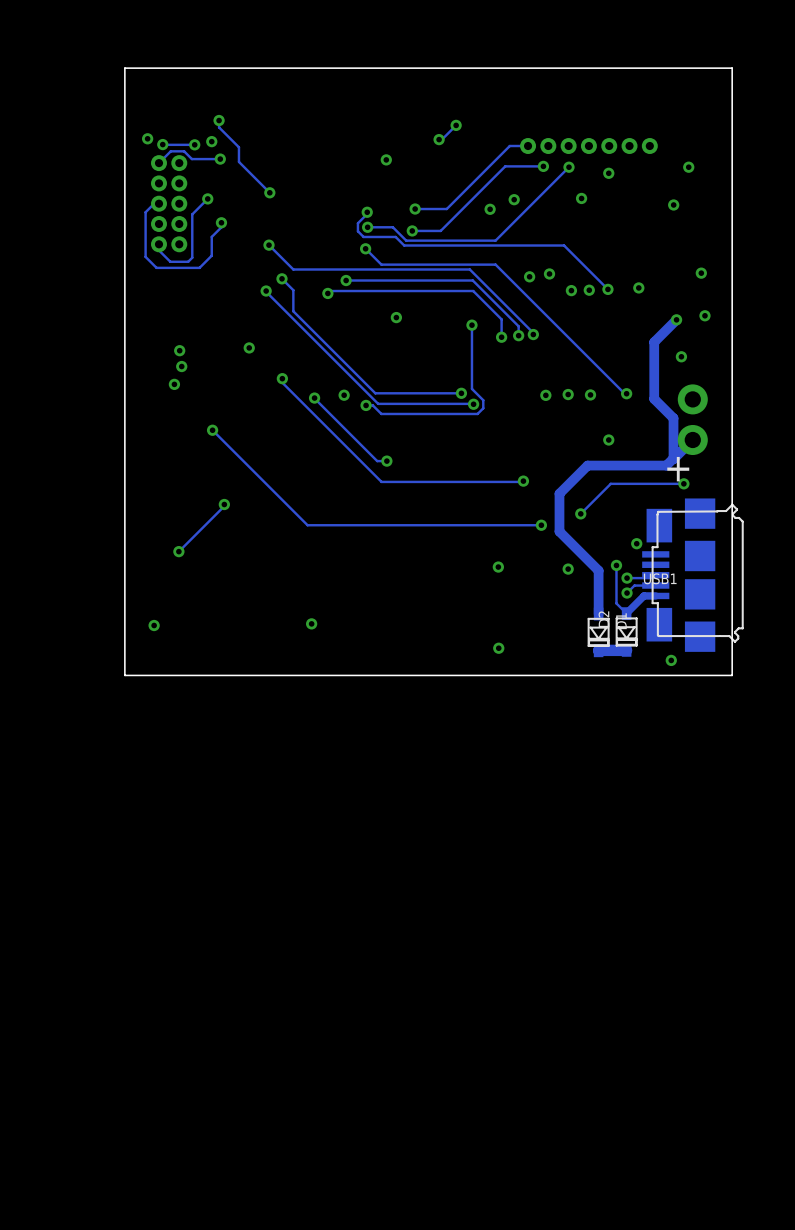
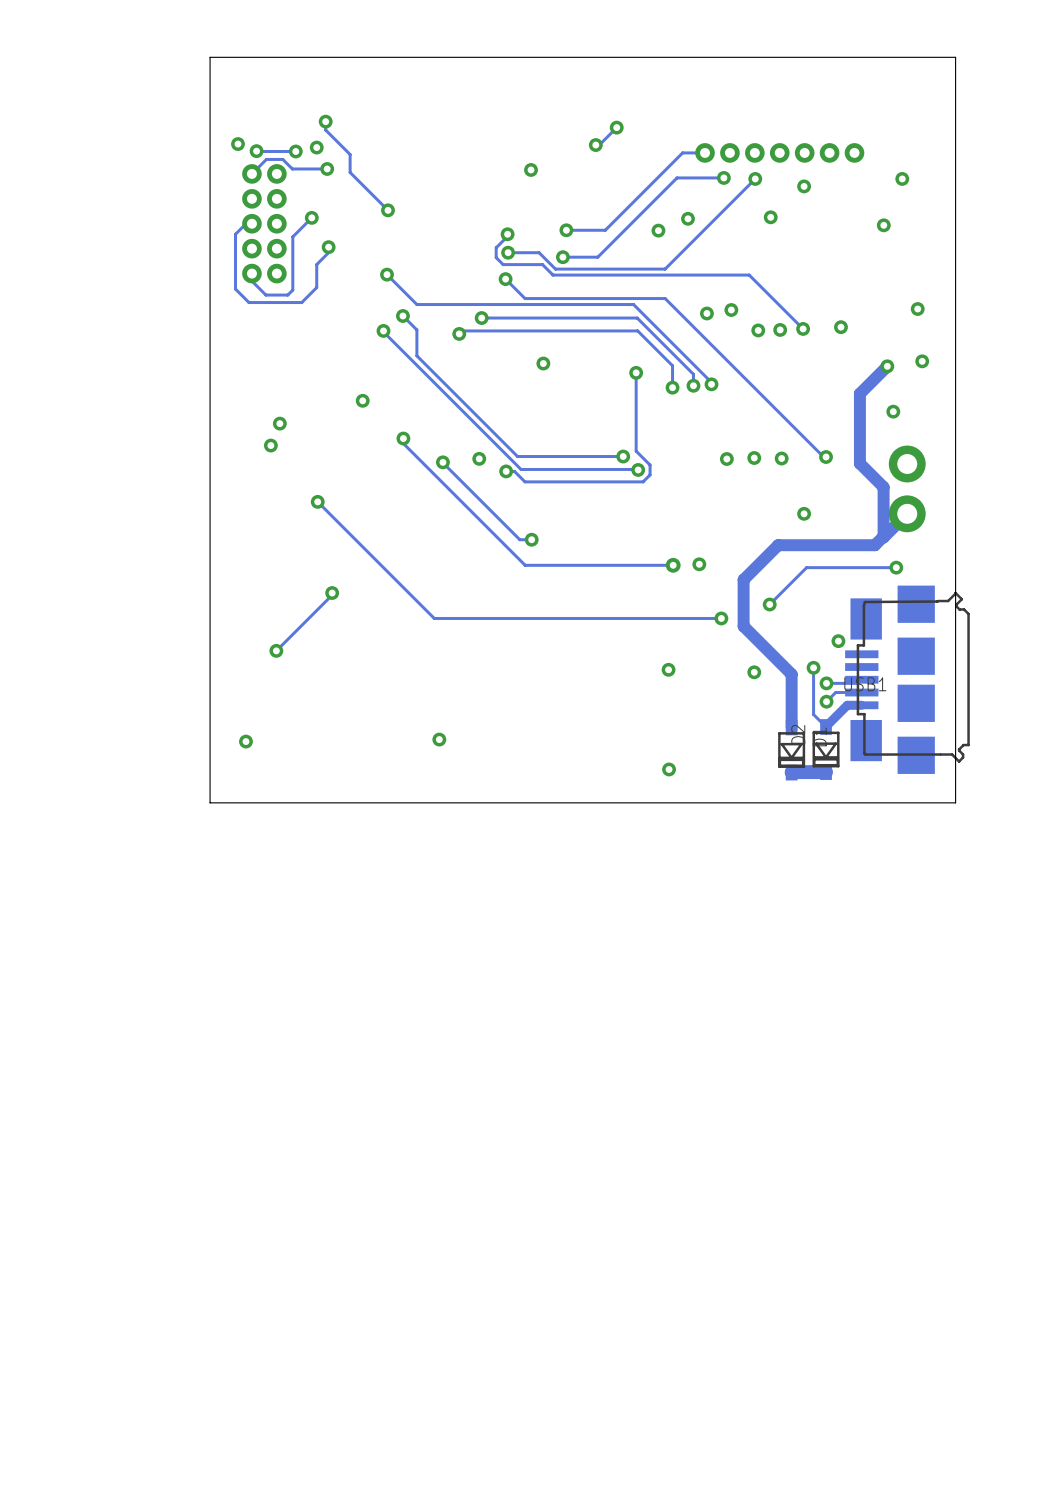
via: (179, 350) -> none
text: + (678, 469) -> none
via: none -> (673, 565)
track: (523, 481) (502, 481) -> none
via: (671, 660) -> none

